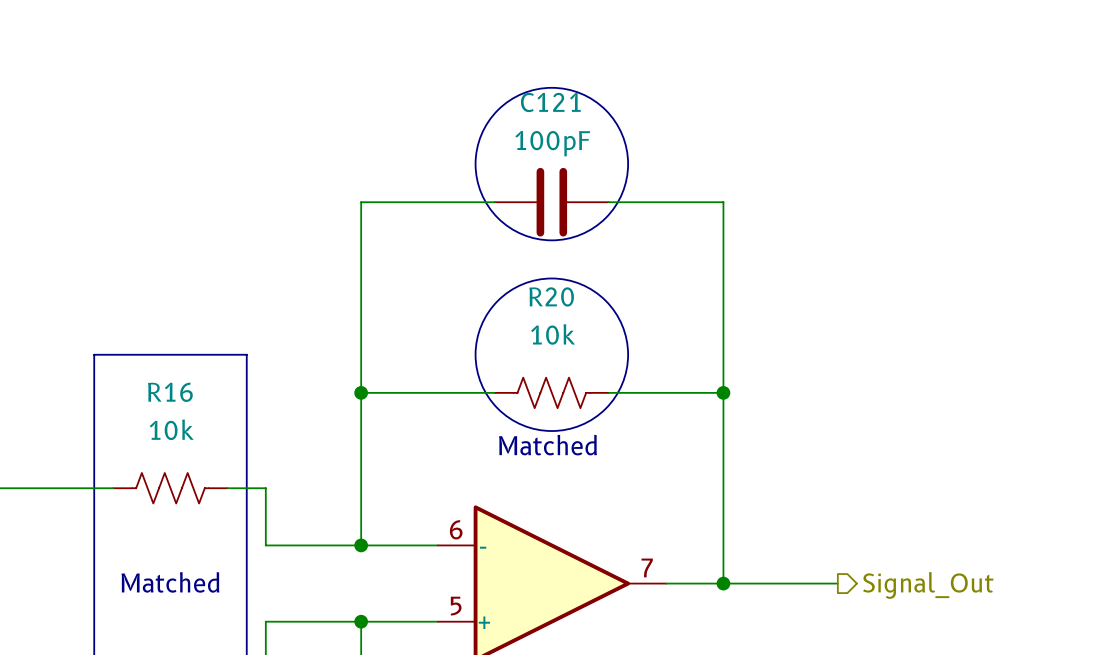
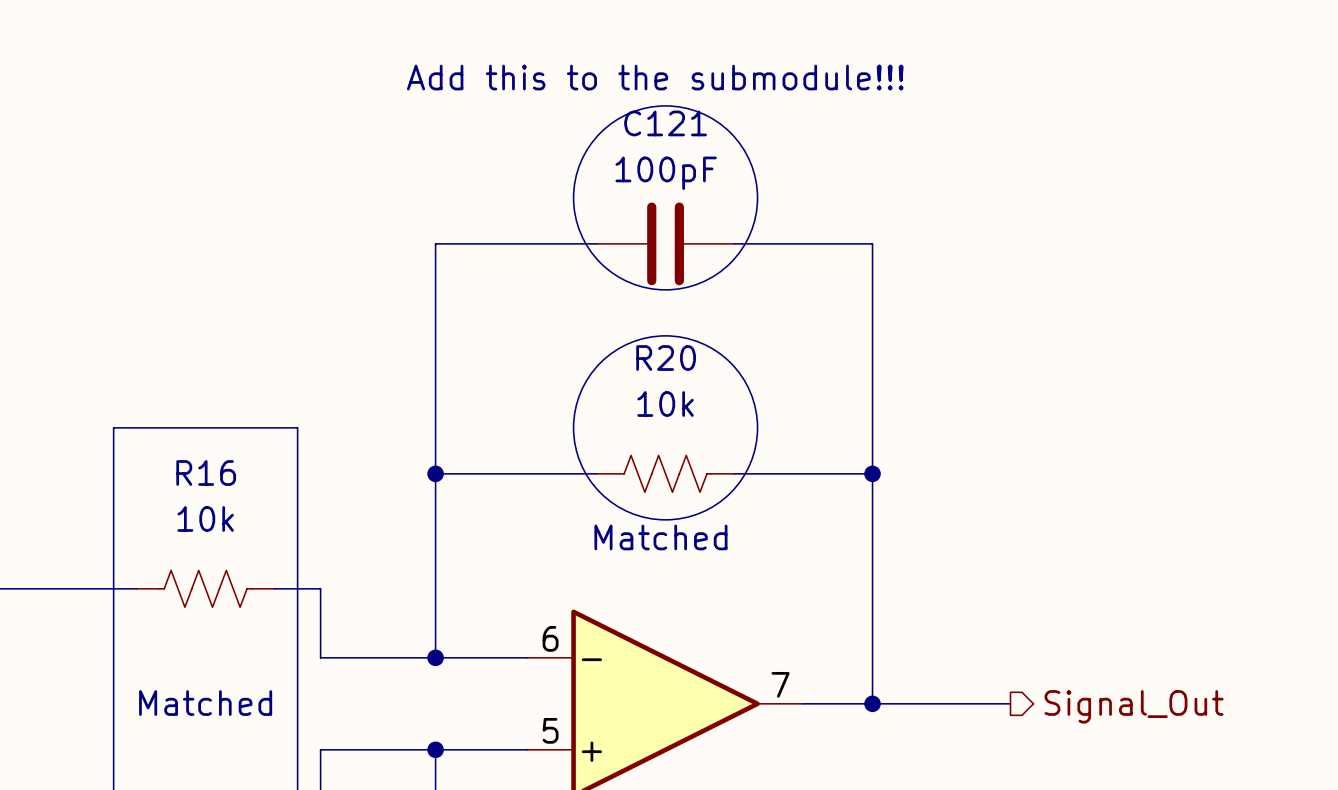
text: none -> Add this to the submodule!!! (655, 77)

